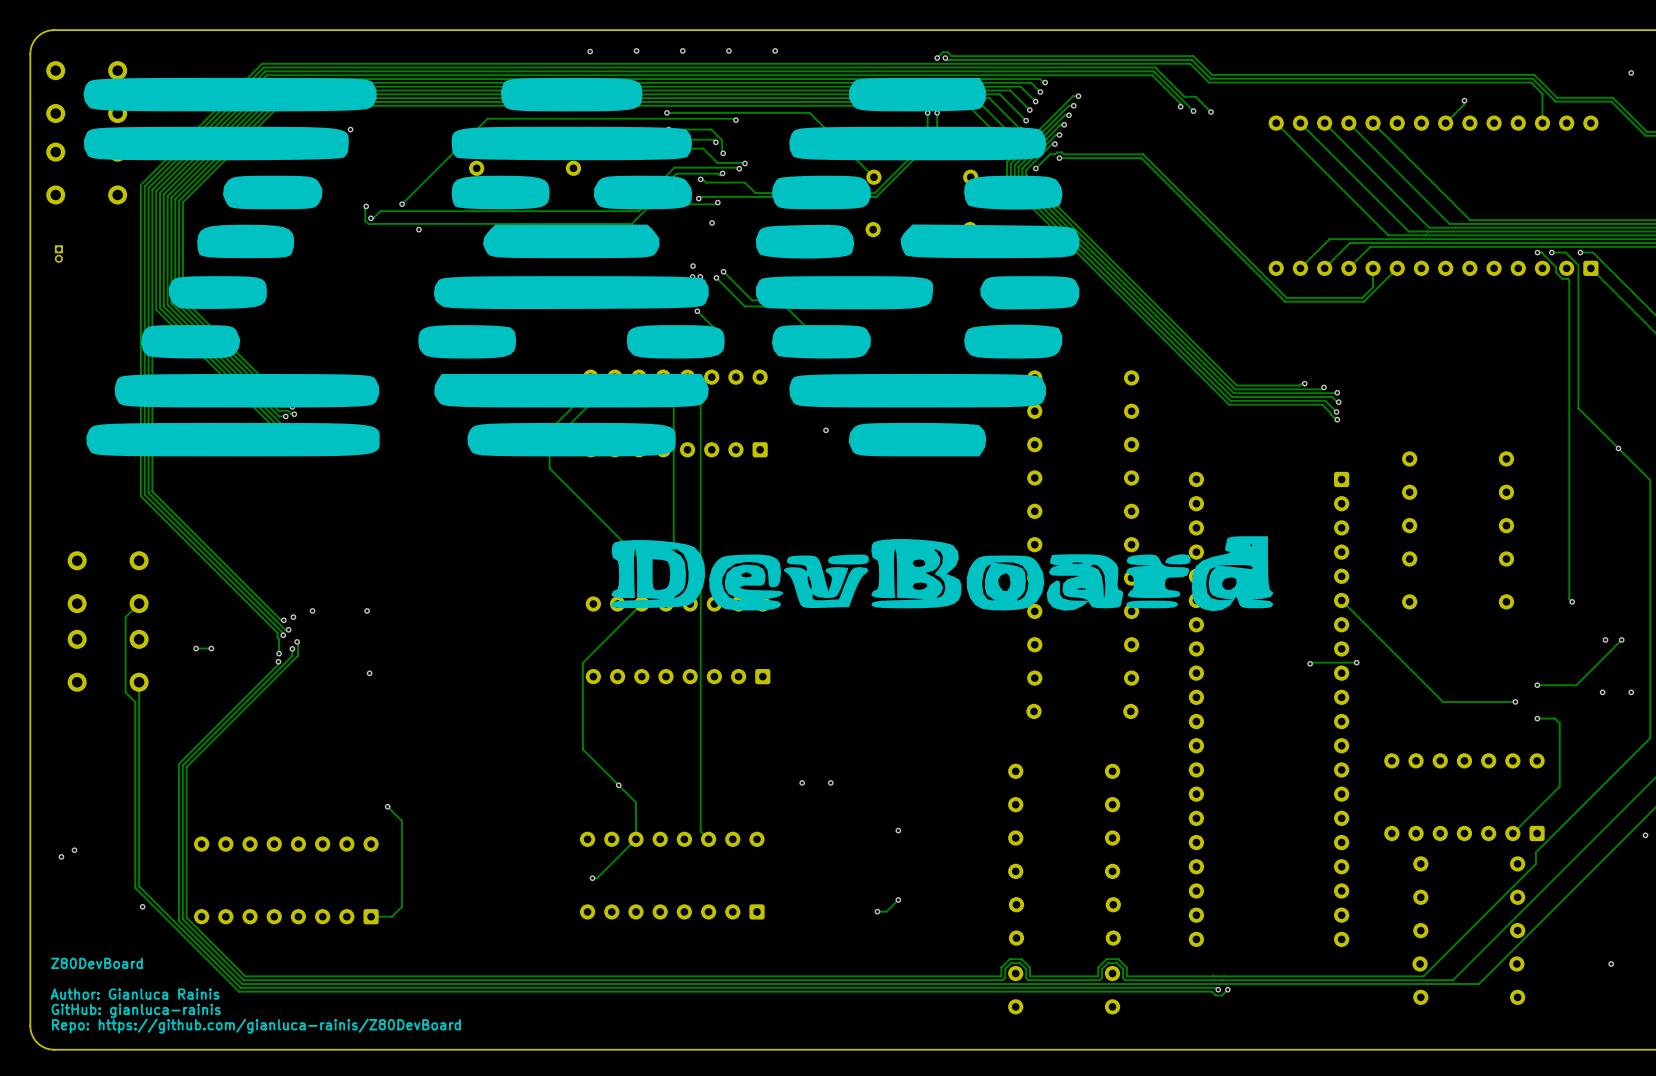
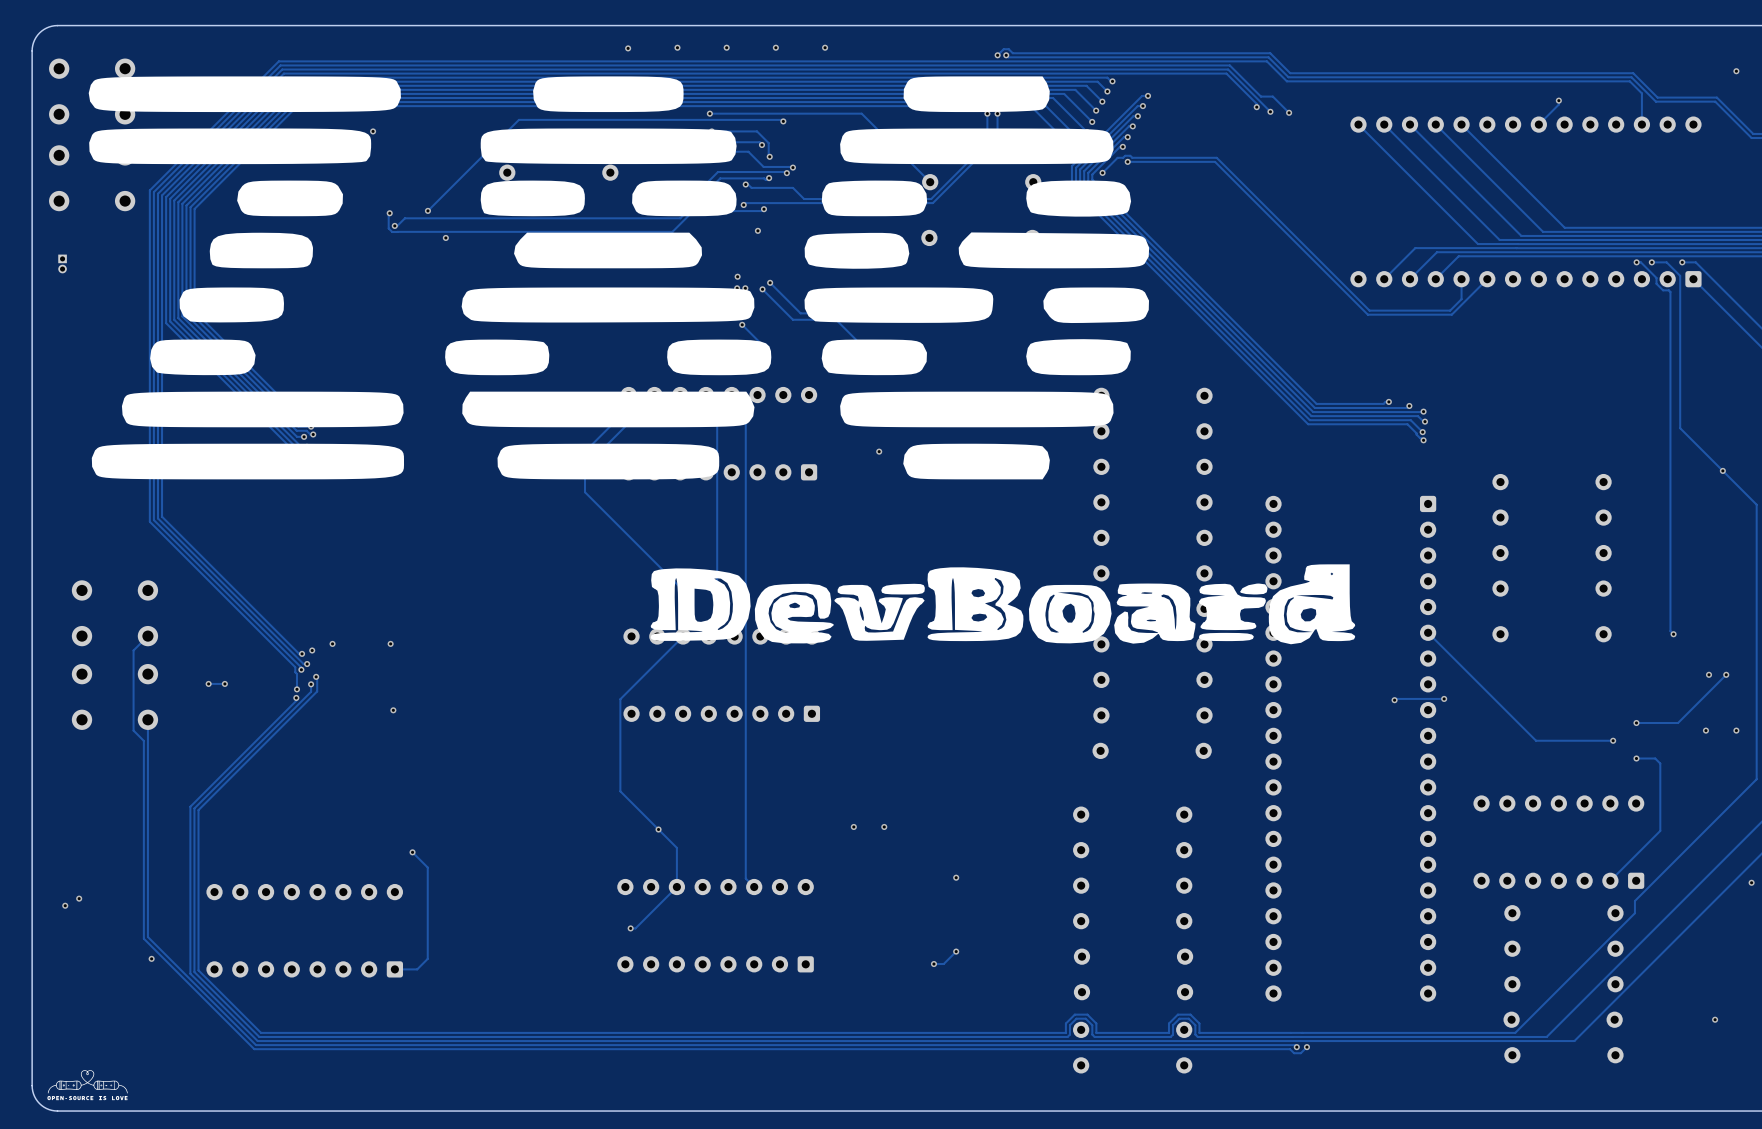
text: Z80DevBoard (96, 963) -> none
text: Author: Gianluca Rainis (135, 994) -> none
text: GitHub: gianluca-rainis (136, 1010) -> none
drawing: none -> [47, 1070, 128, 1101]
text: Repo: https://github.com/gianluca-rainis/Z80DevBoard (256, 1026) -> none

